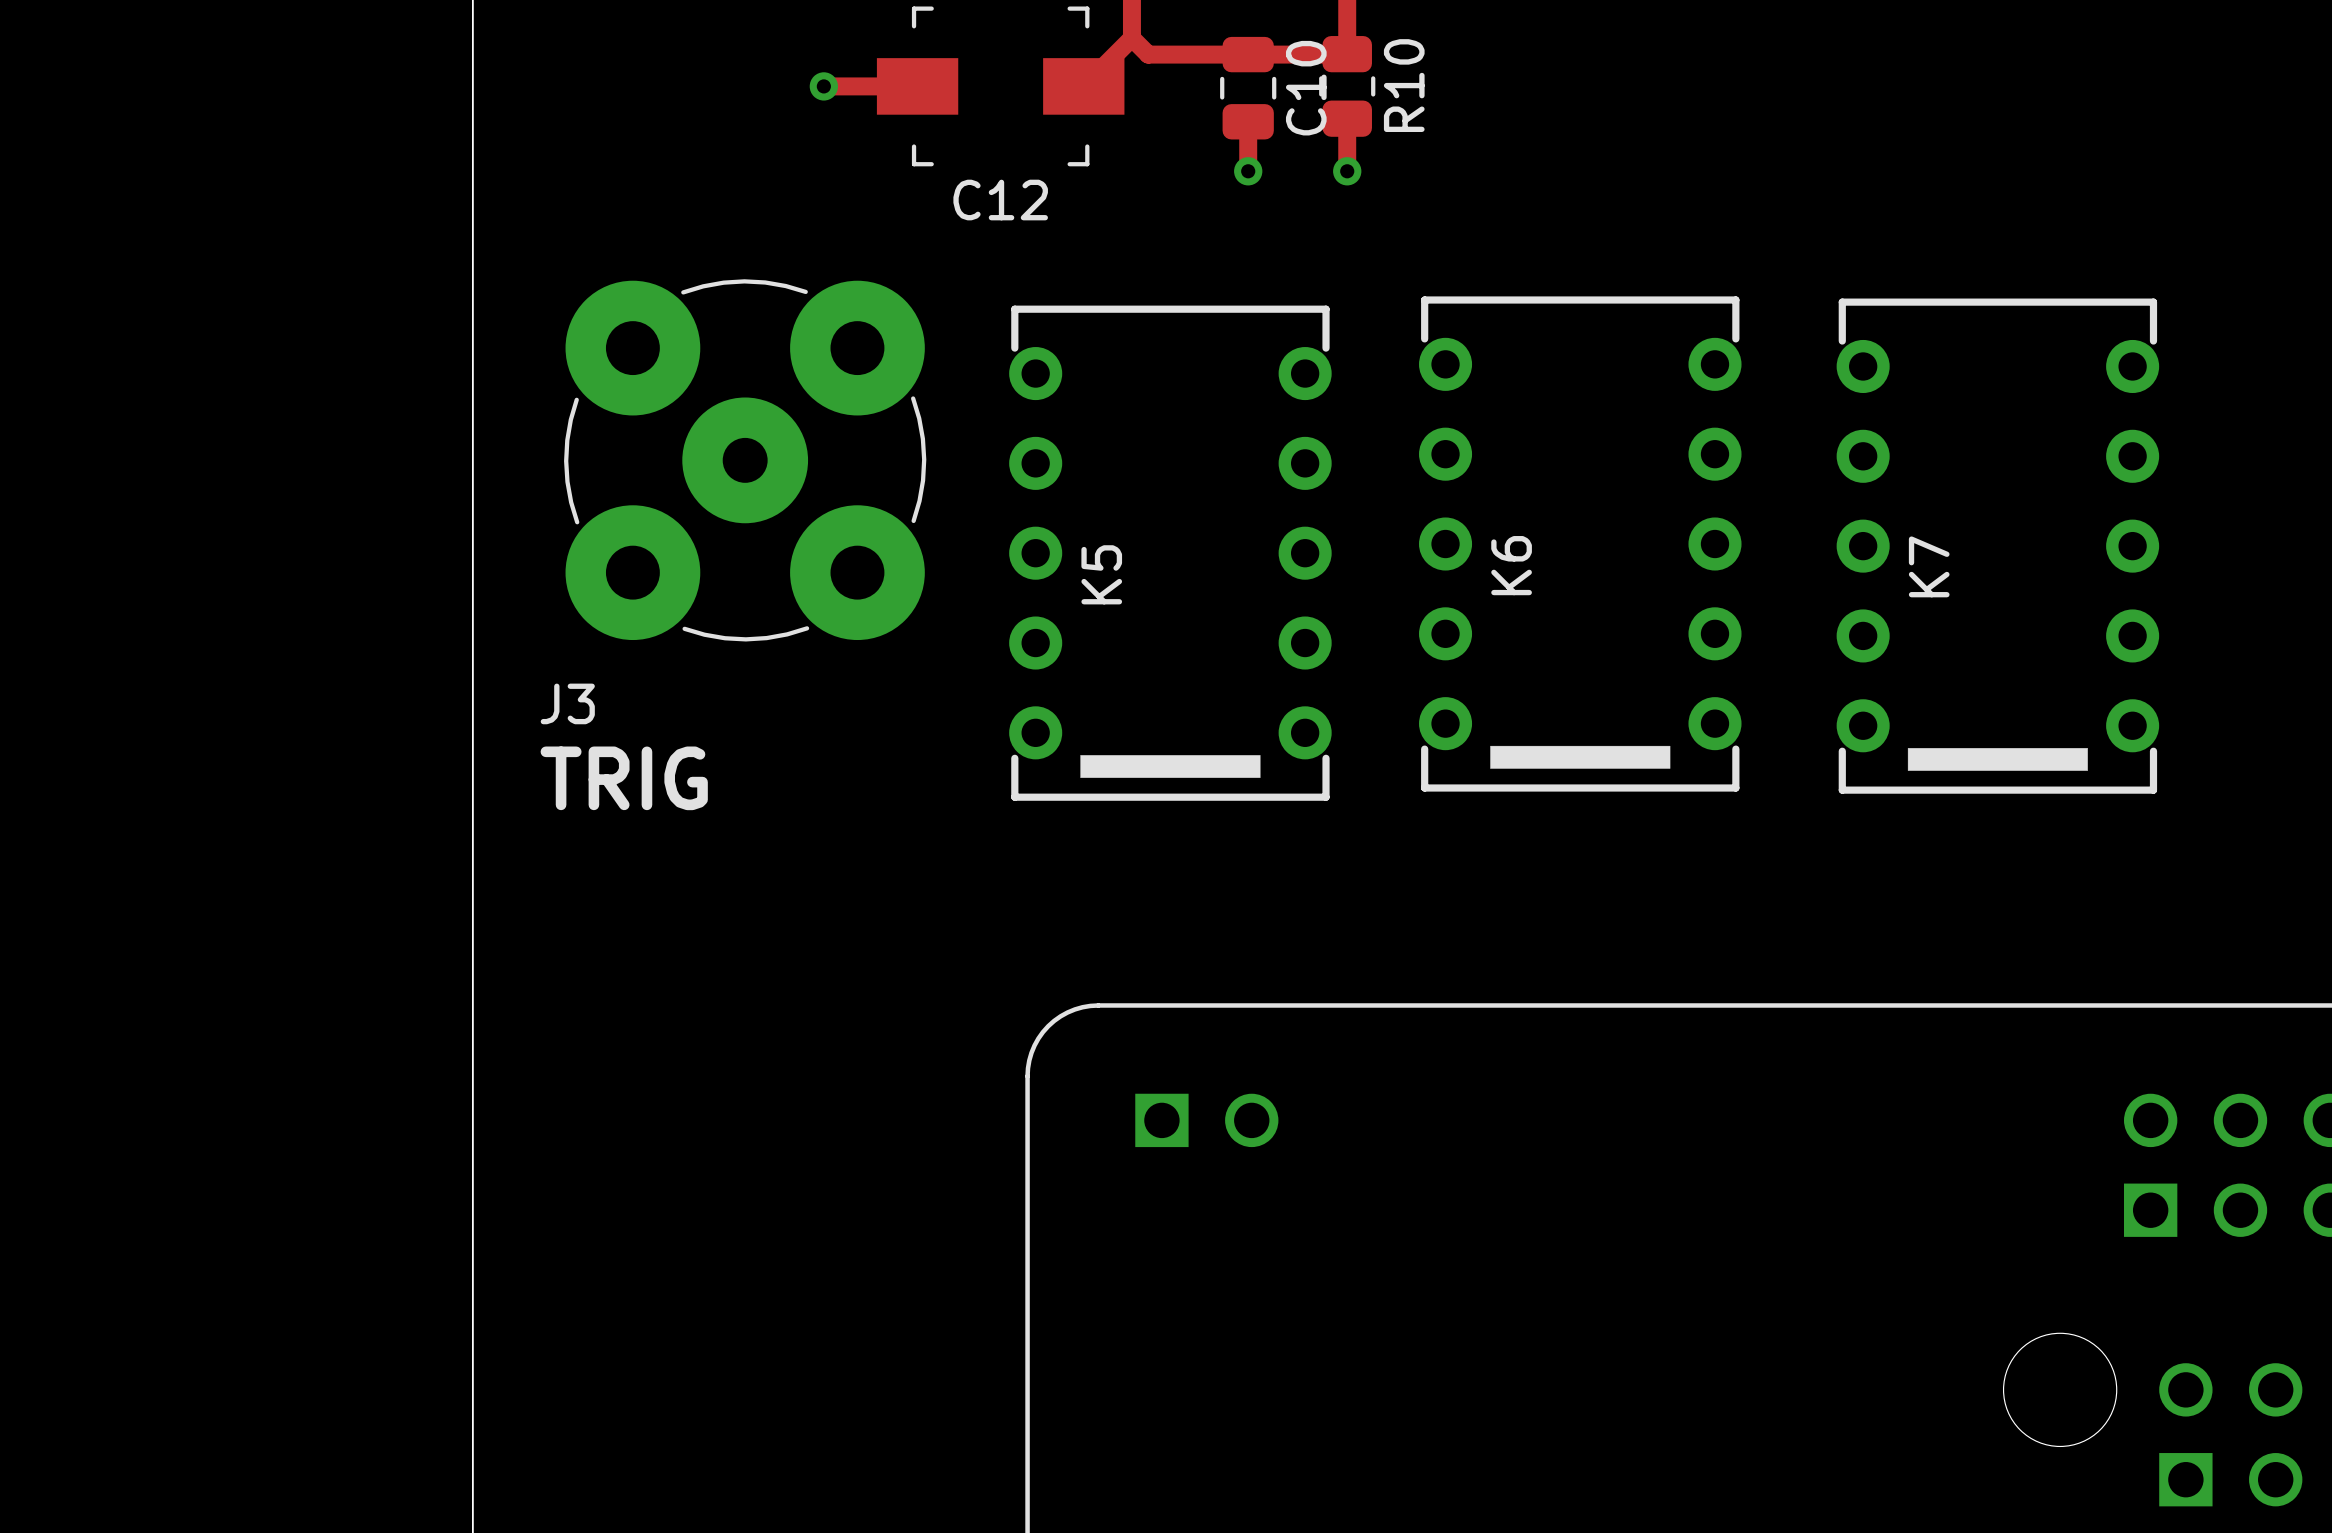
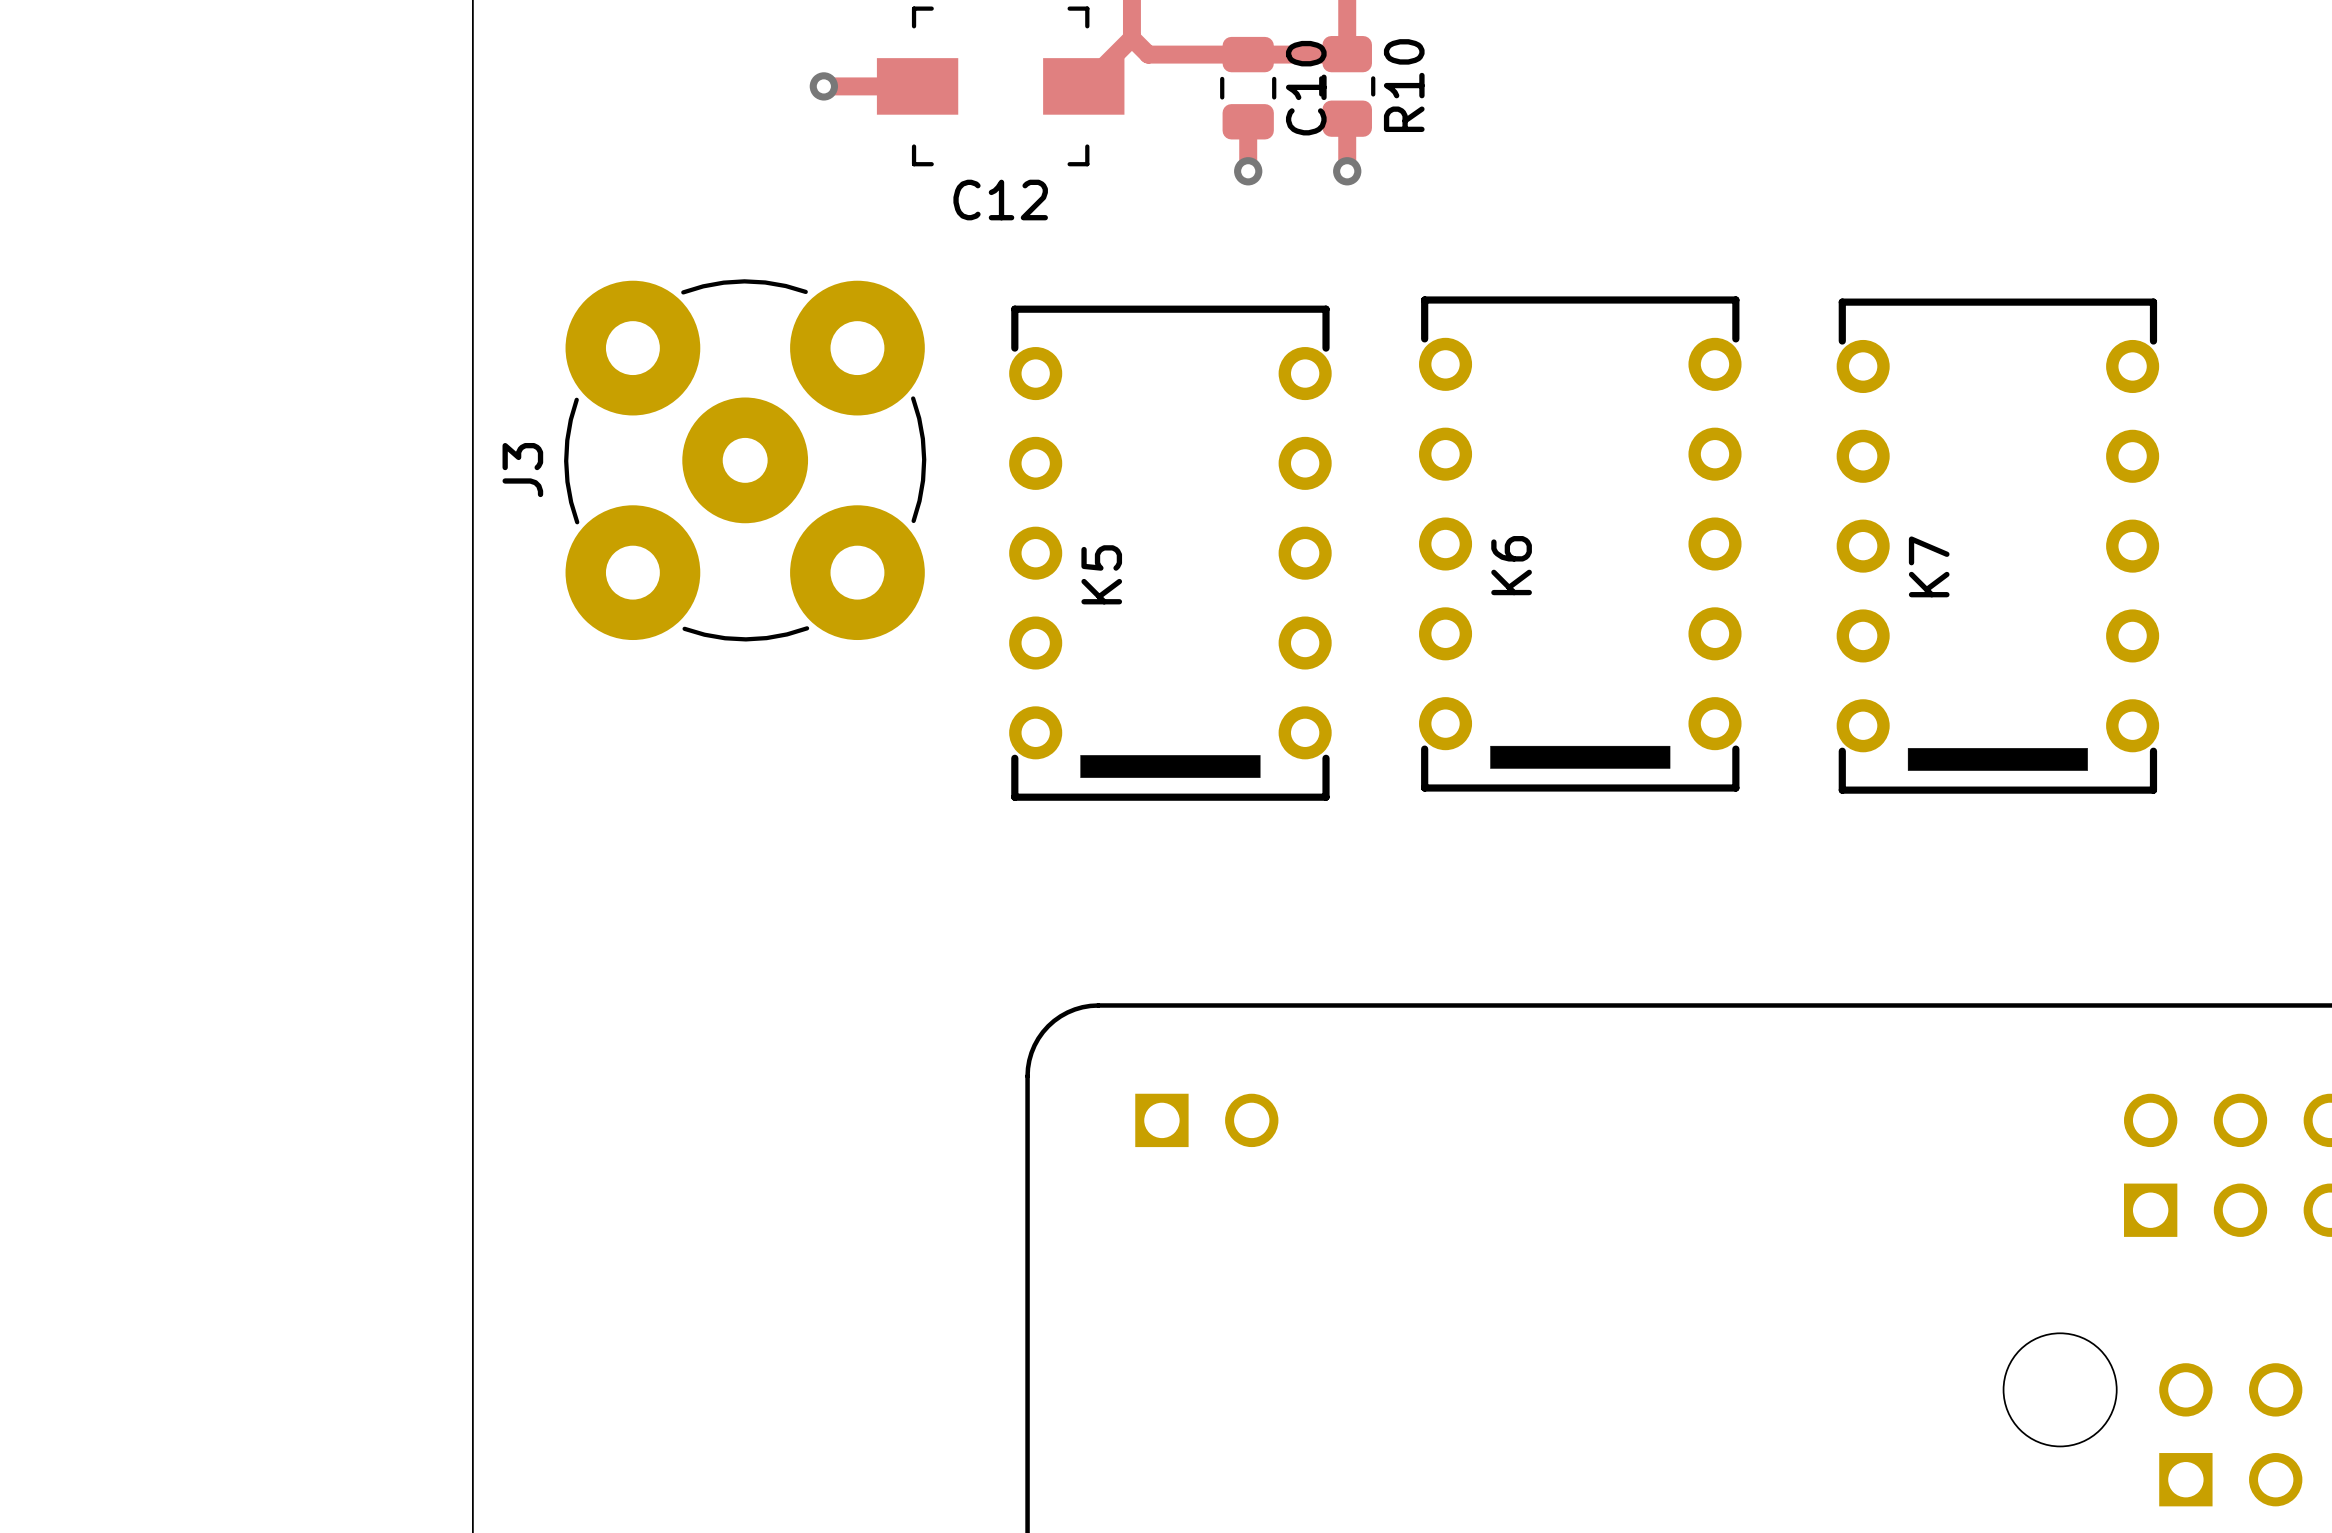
J3 name rotation: 0° (567, 703) -> 90° counterclockwise (522, 470)
J3 name position: J3 (567, 703) -> J3 (522, 470)
text: TRIG (624, 778) -> none

